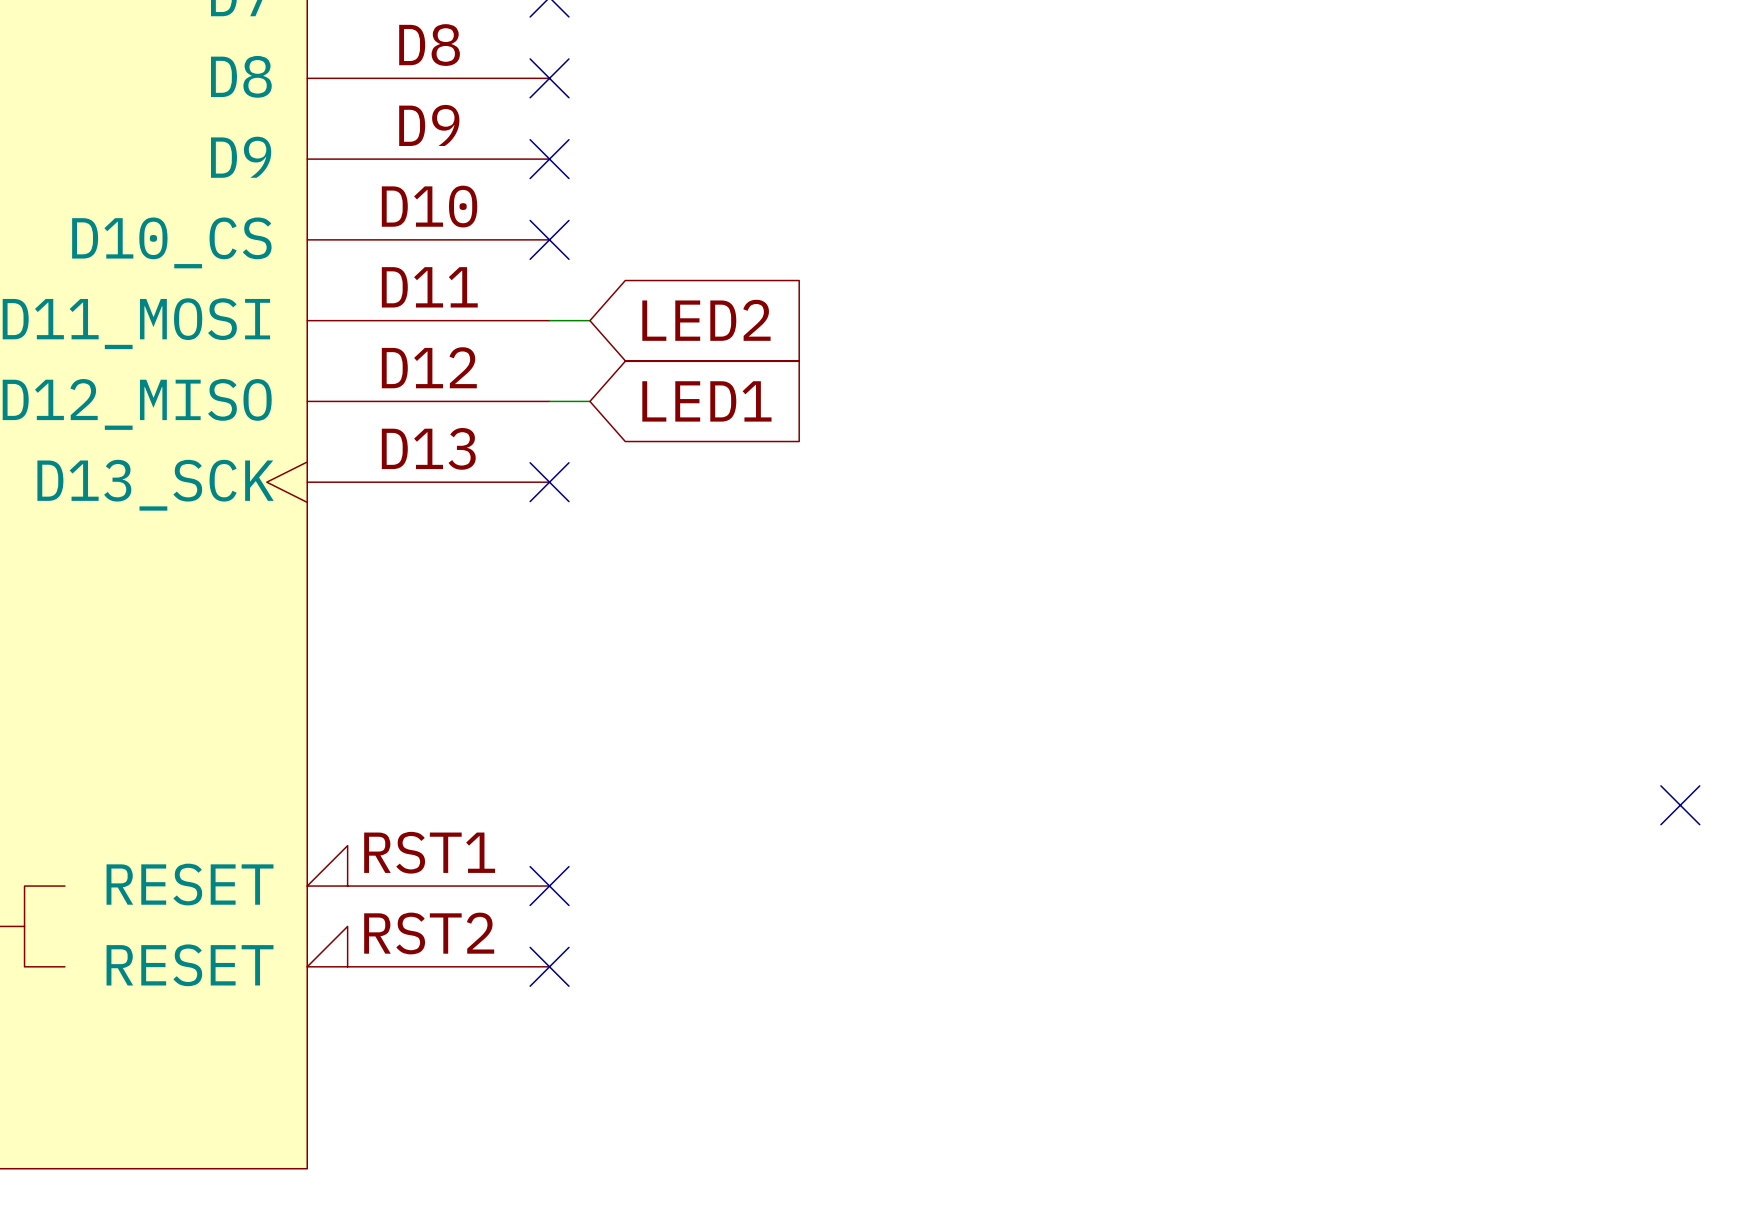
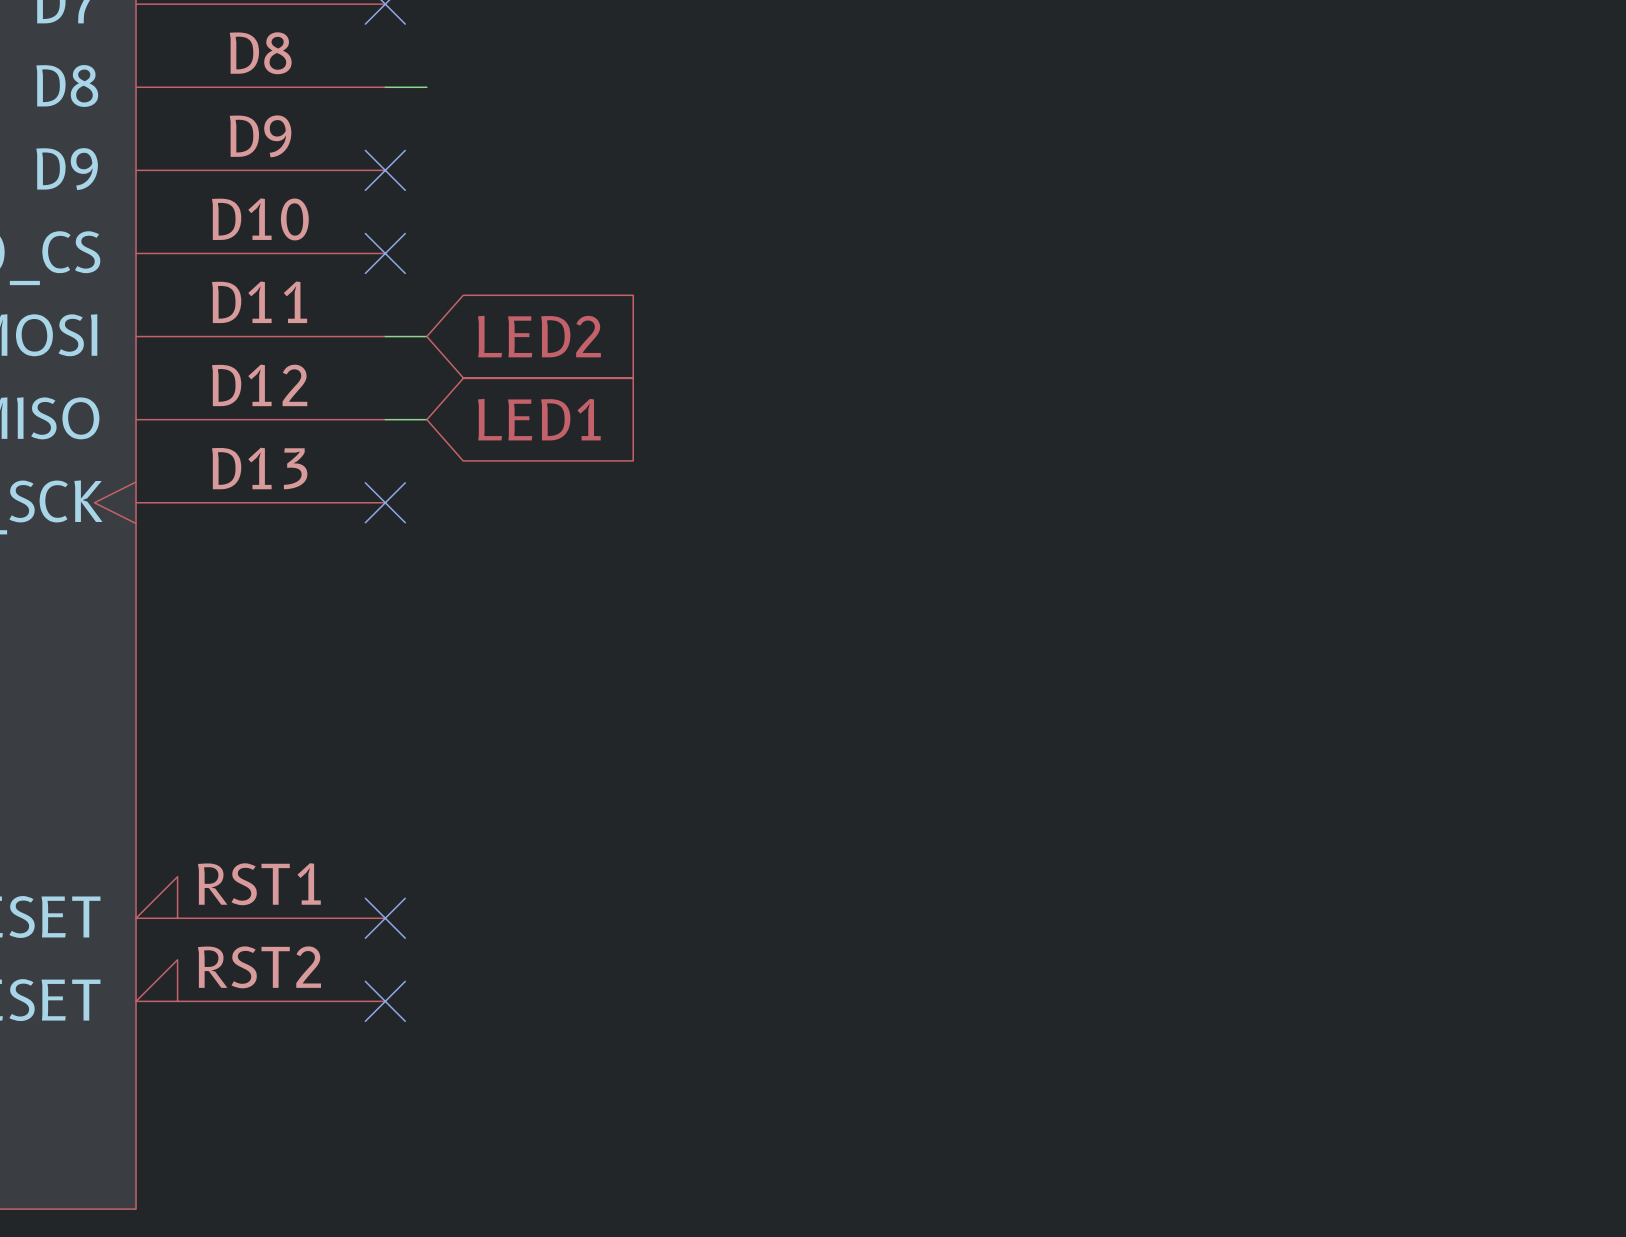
wire: none -> (385, 87) (426, 87)
no-connect mark: (549, 78) -> none
no-connect mark: (1680, 805) -> none

